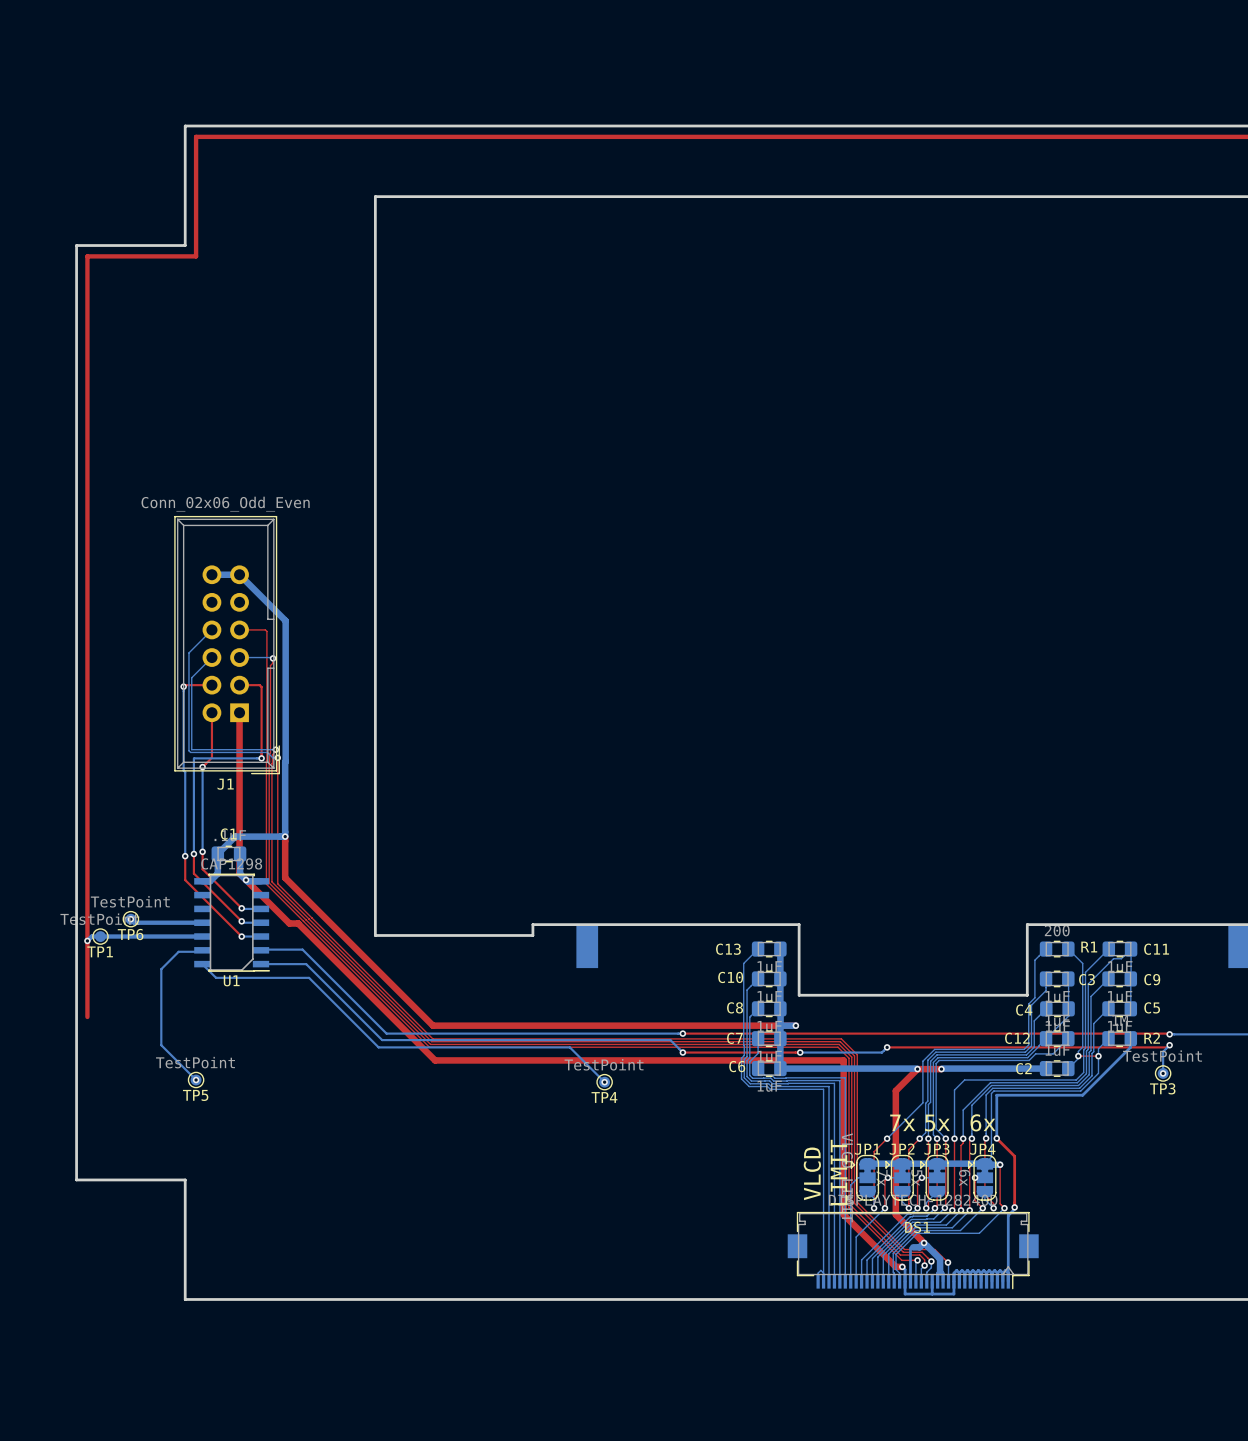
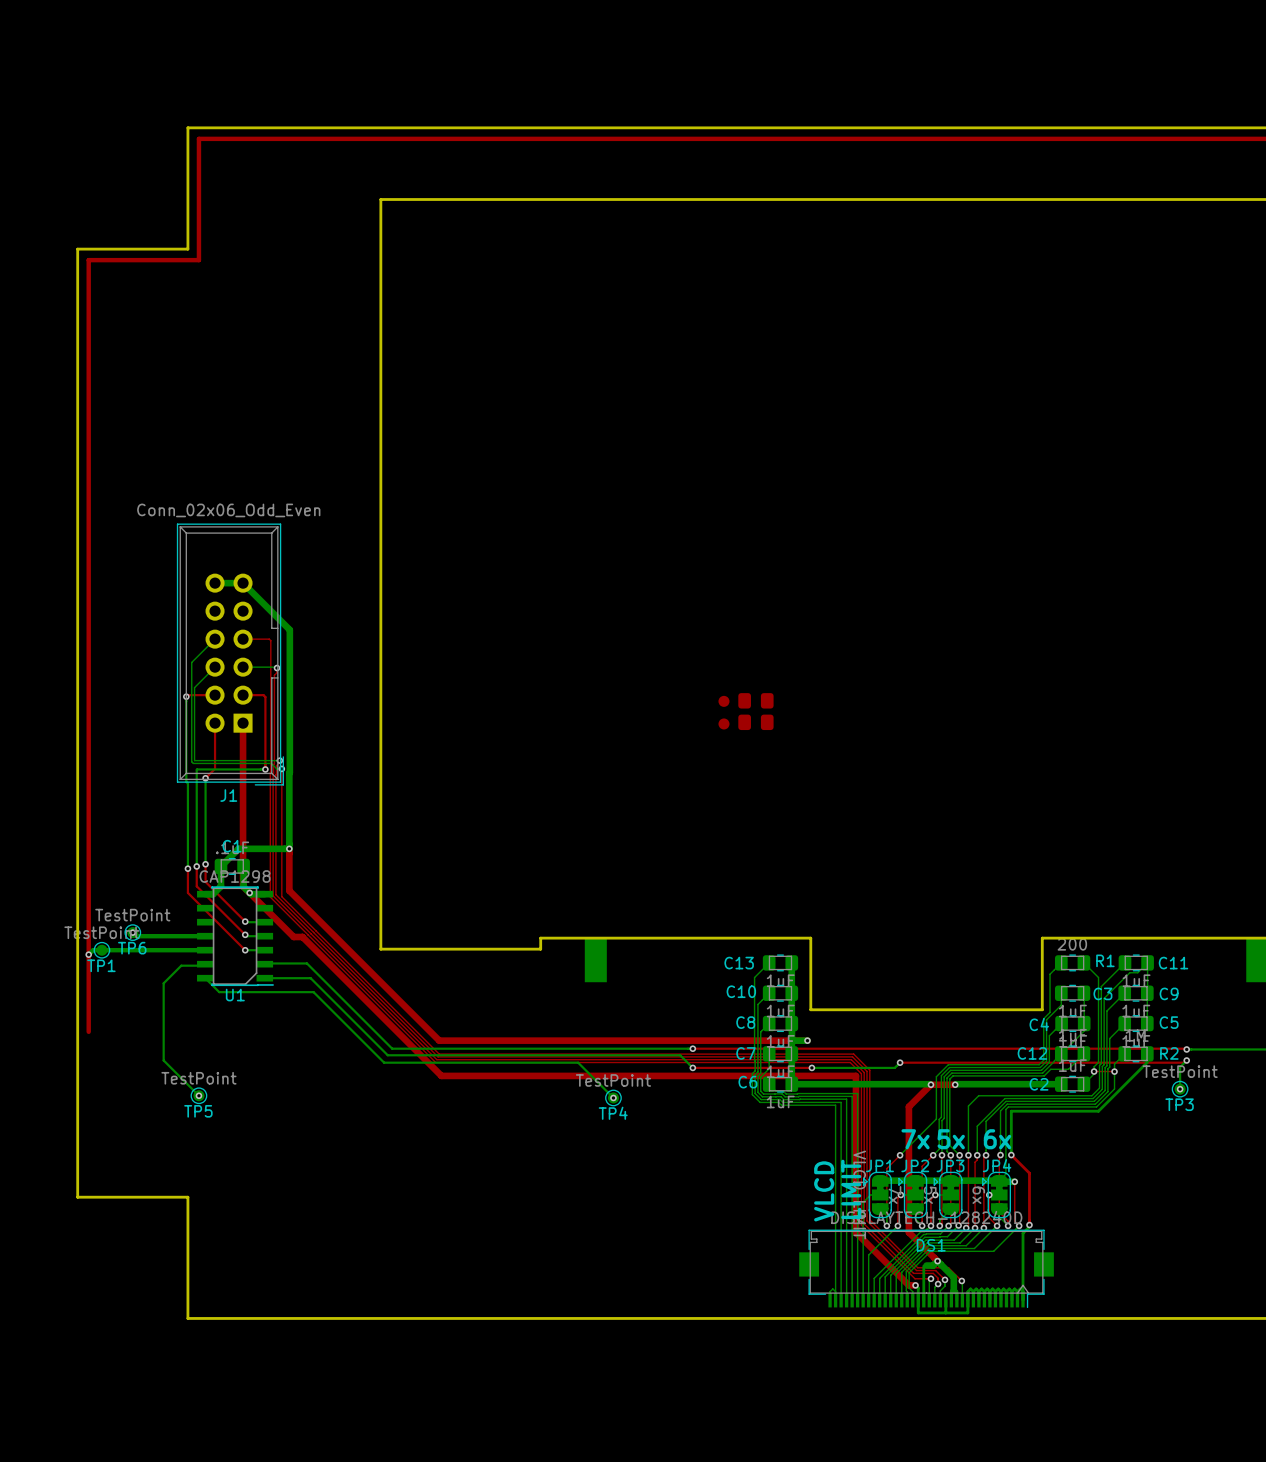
part: none -> (755, 700)
part: none -> (723, 701)
part: none -> (755, 722)
part: none -> (723, 723)

